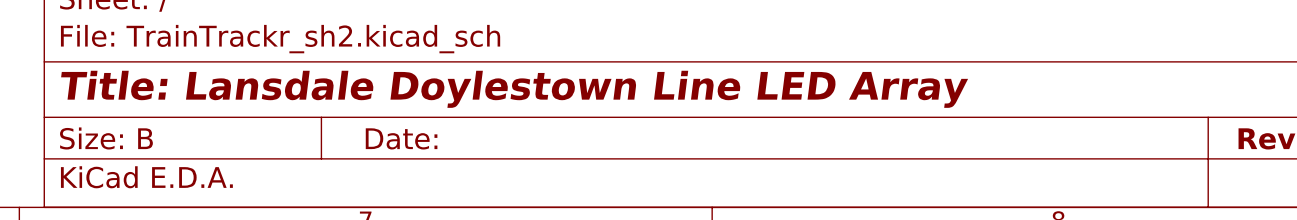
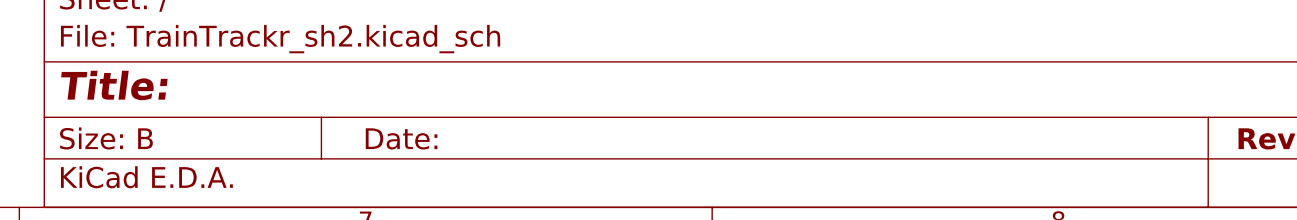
title block: Title: Lansdale Doylestown Line LED Array (514, 89) -> Title: (114, 85)

